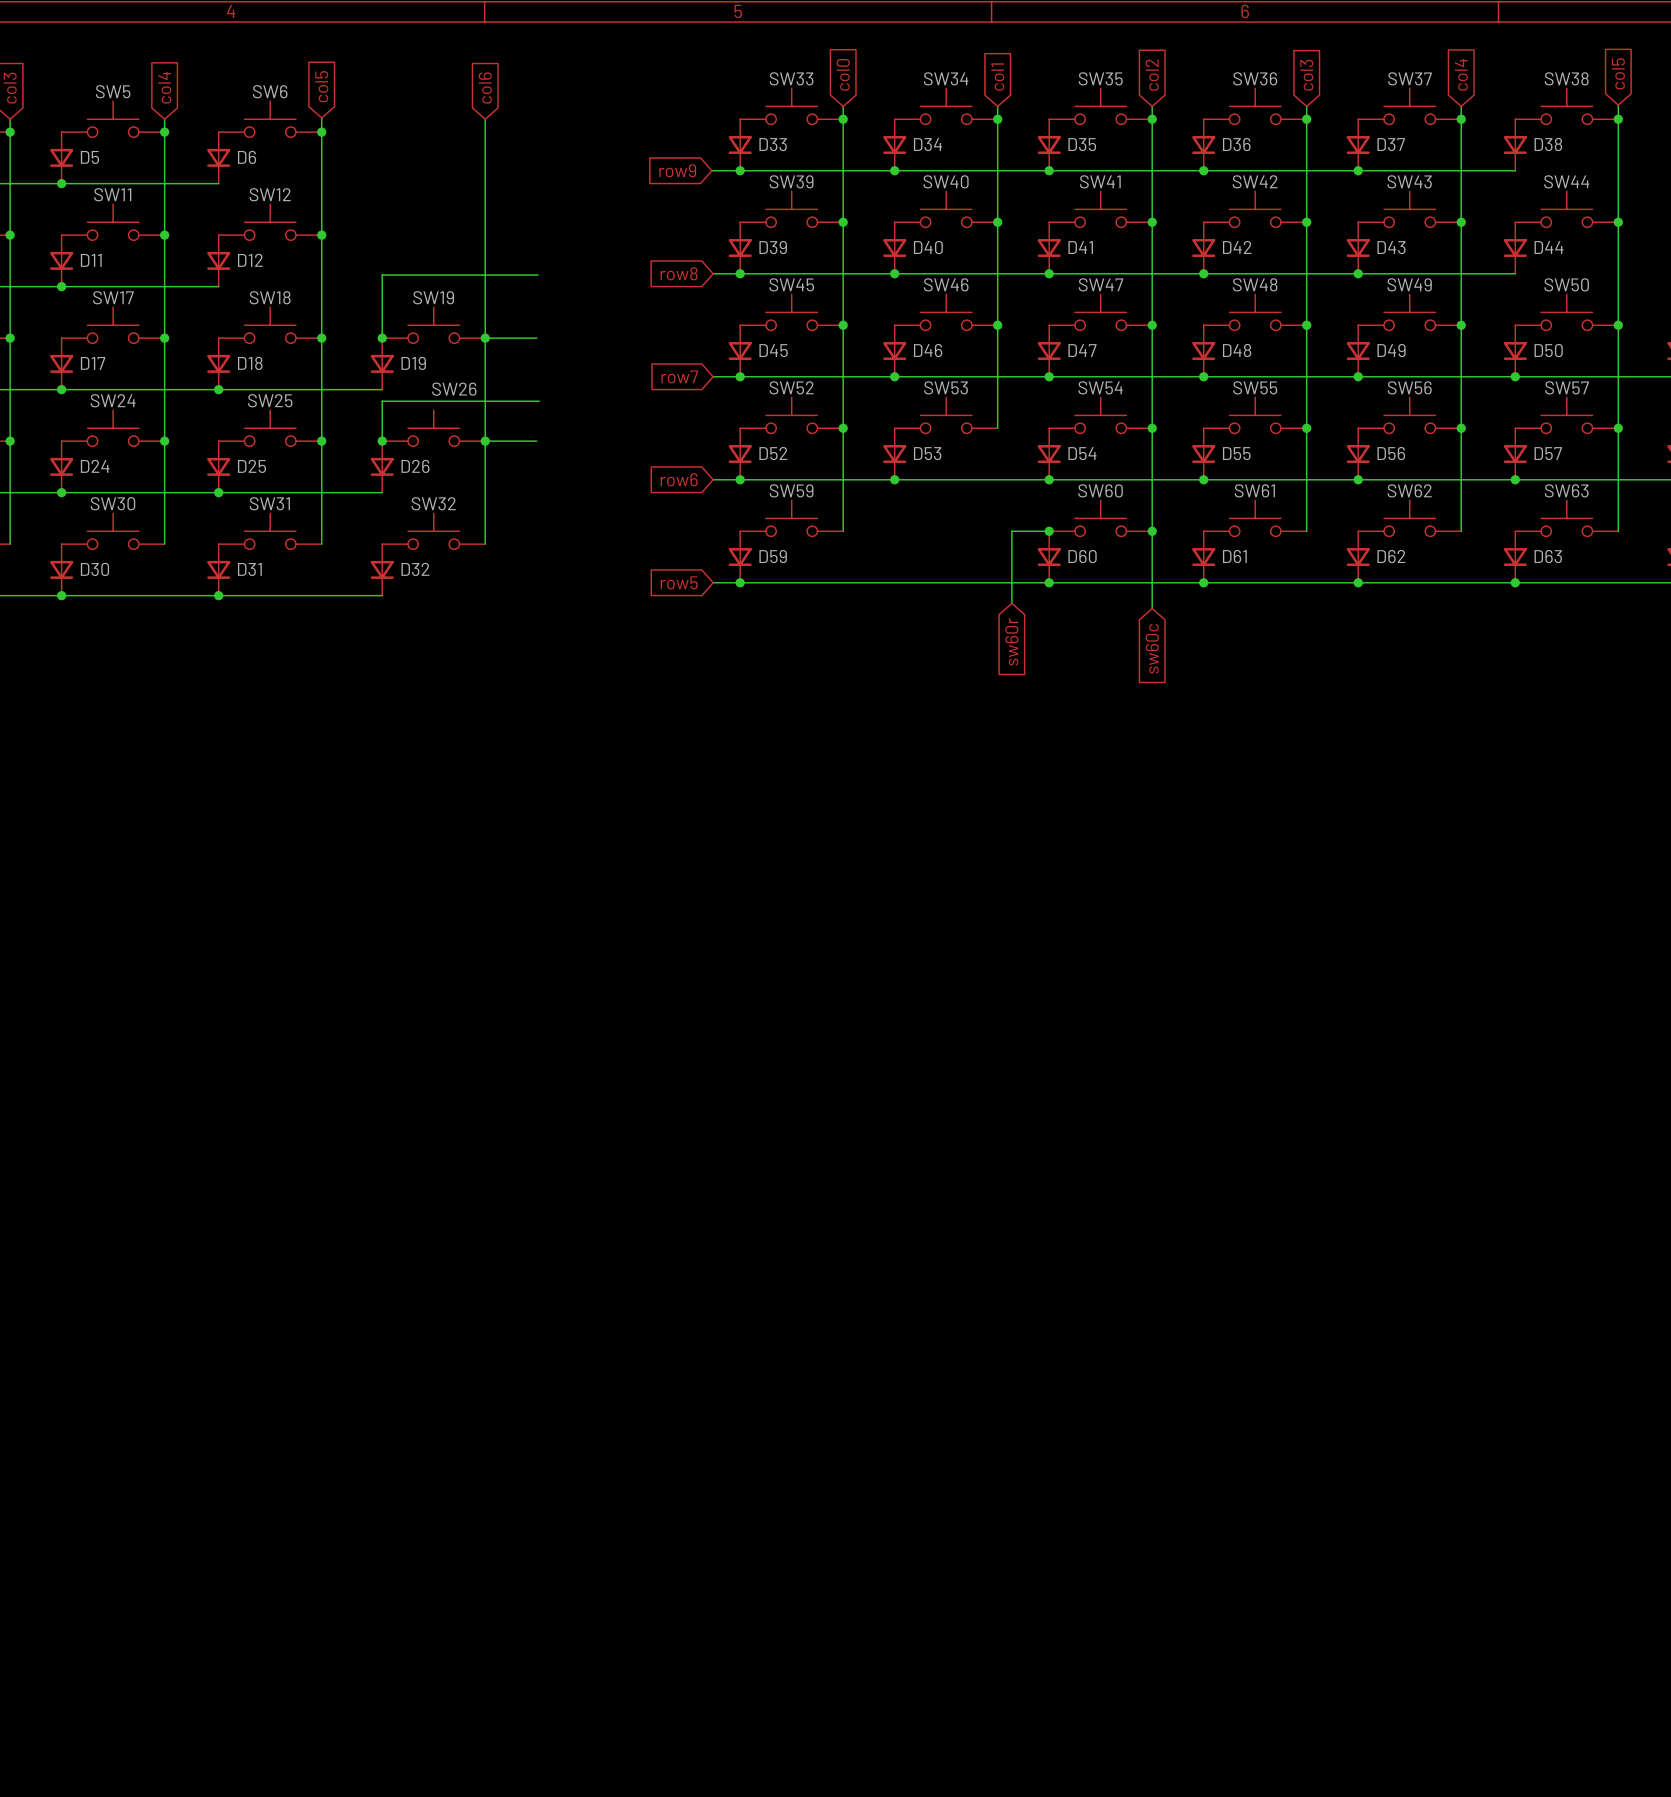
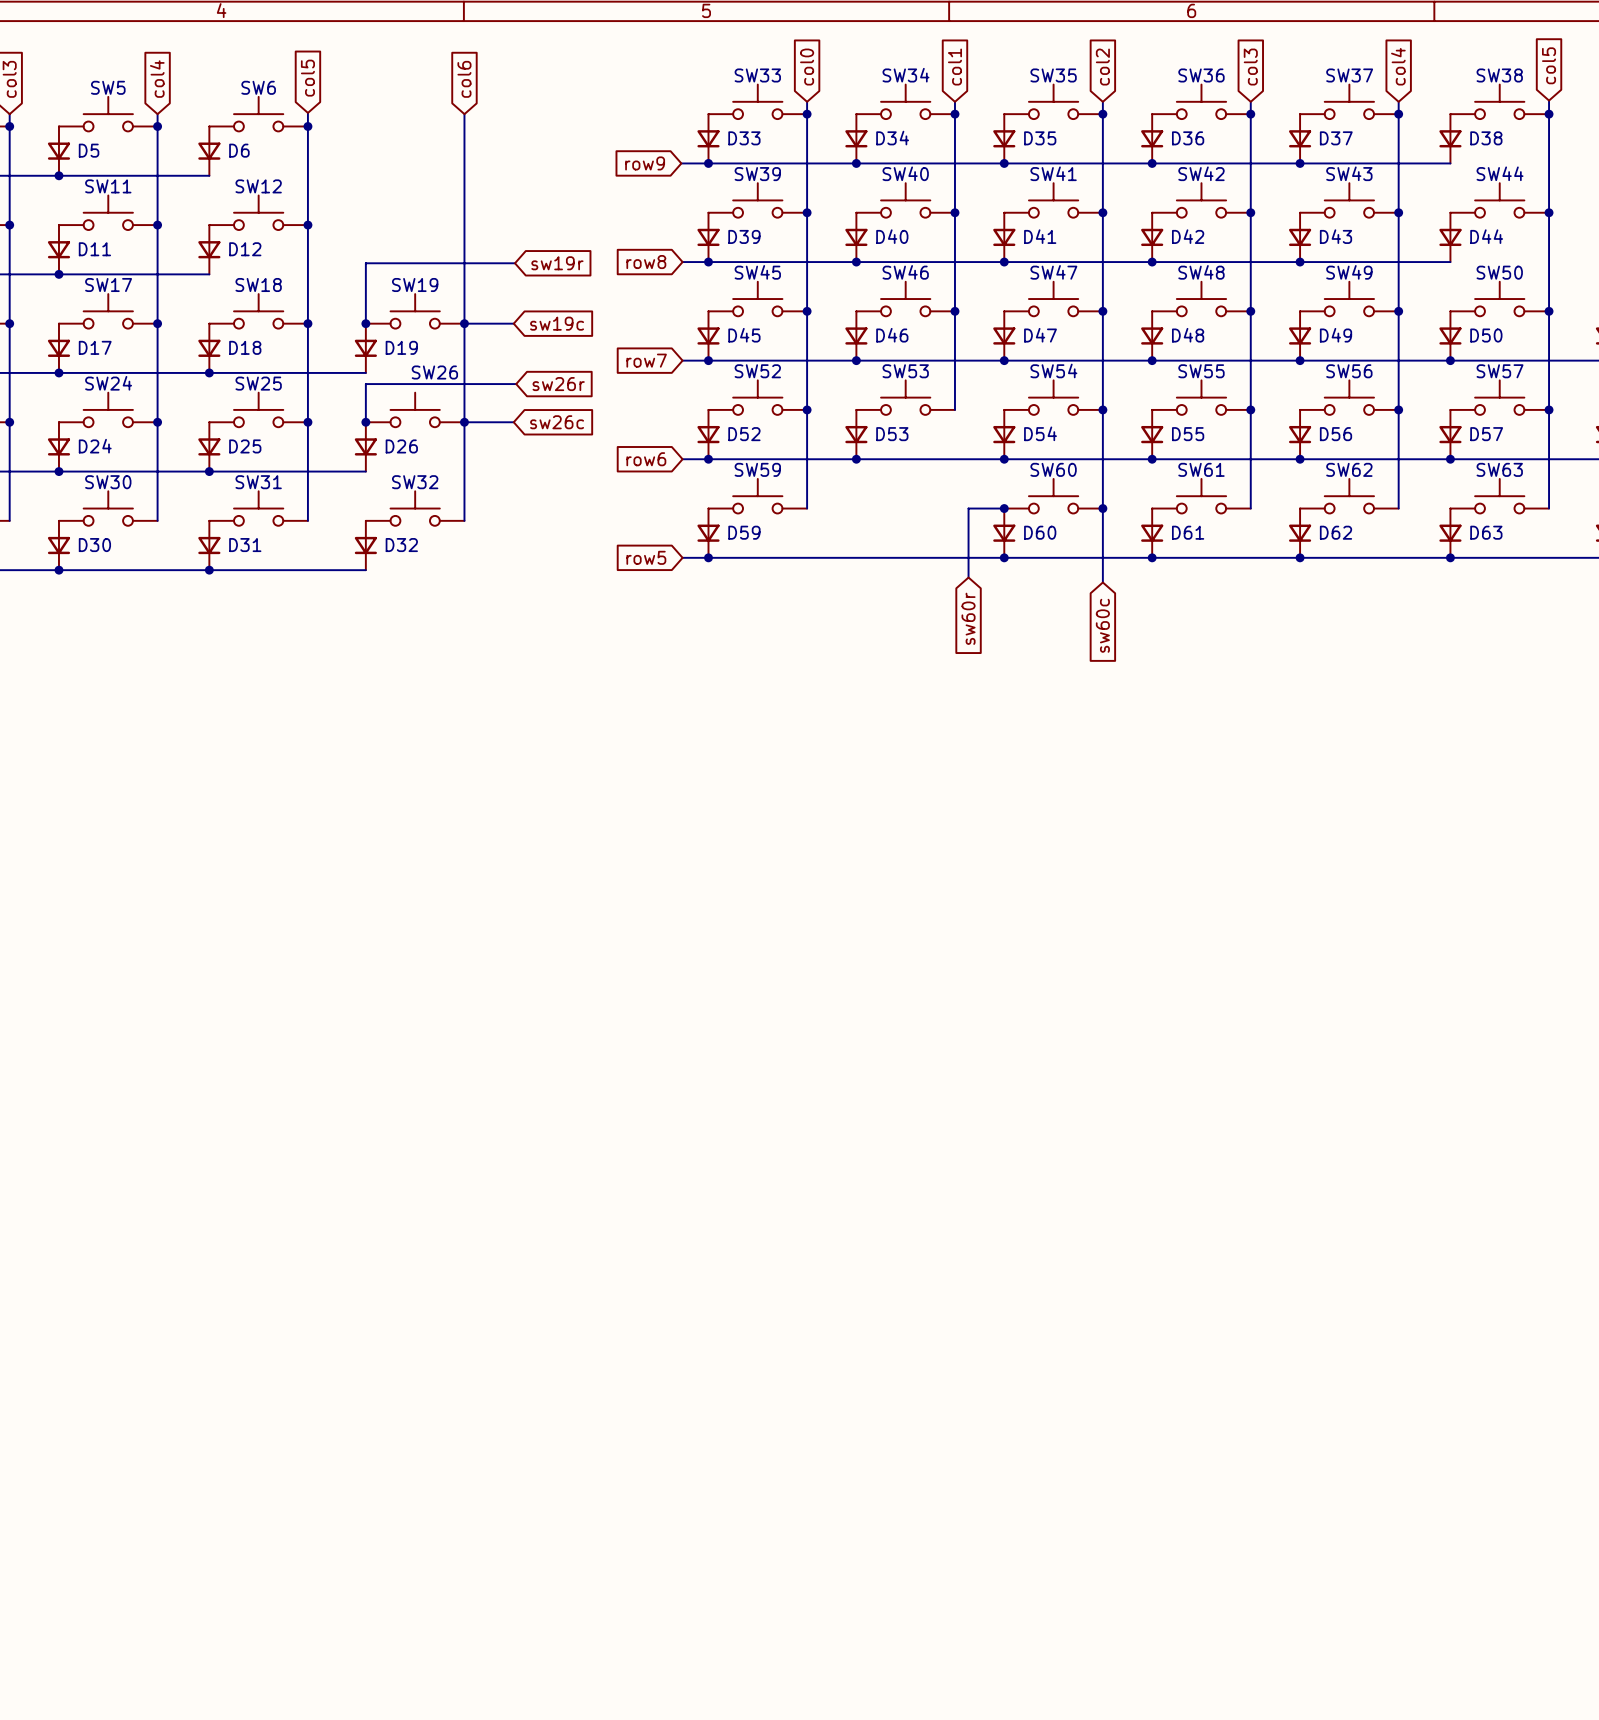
global label: none -> sw19r (557, 263)
global label: none -> sw19c (557, 323)
global label: none -> sw26r (558, 384)
global label: none -> sw26c (557, 422)

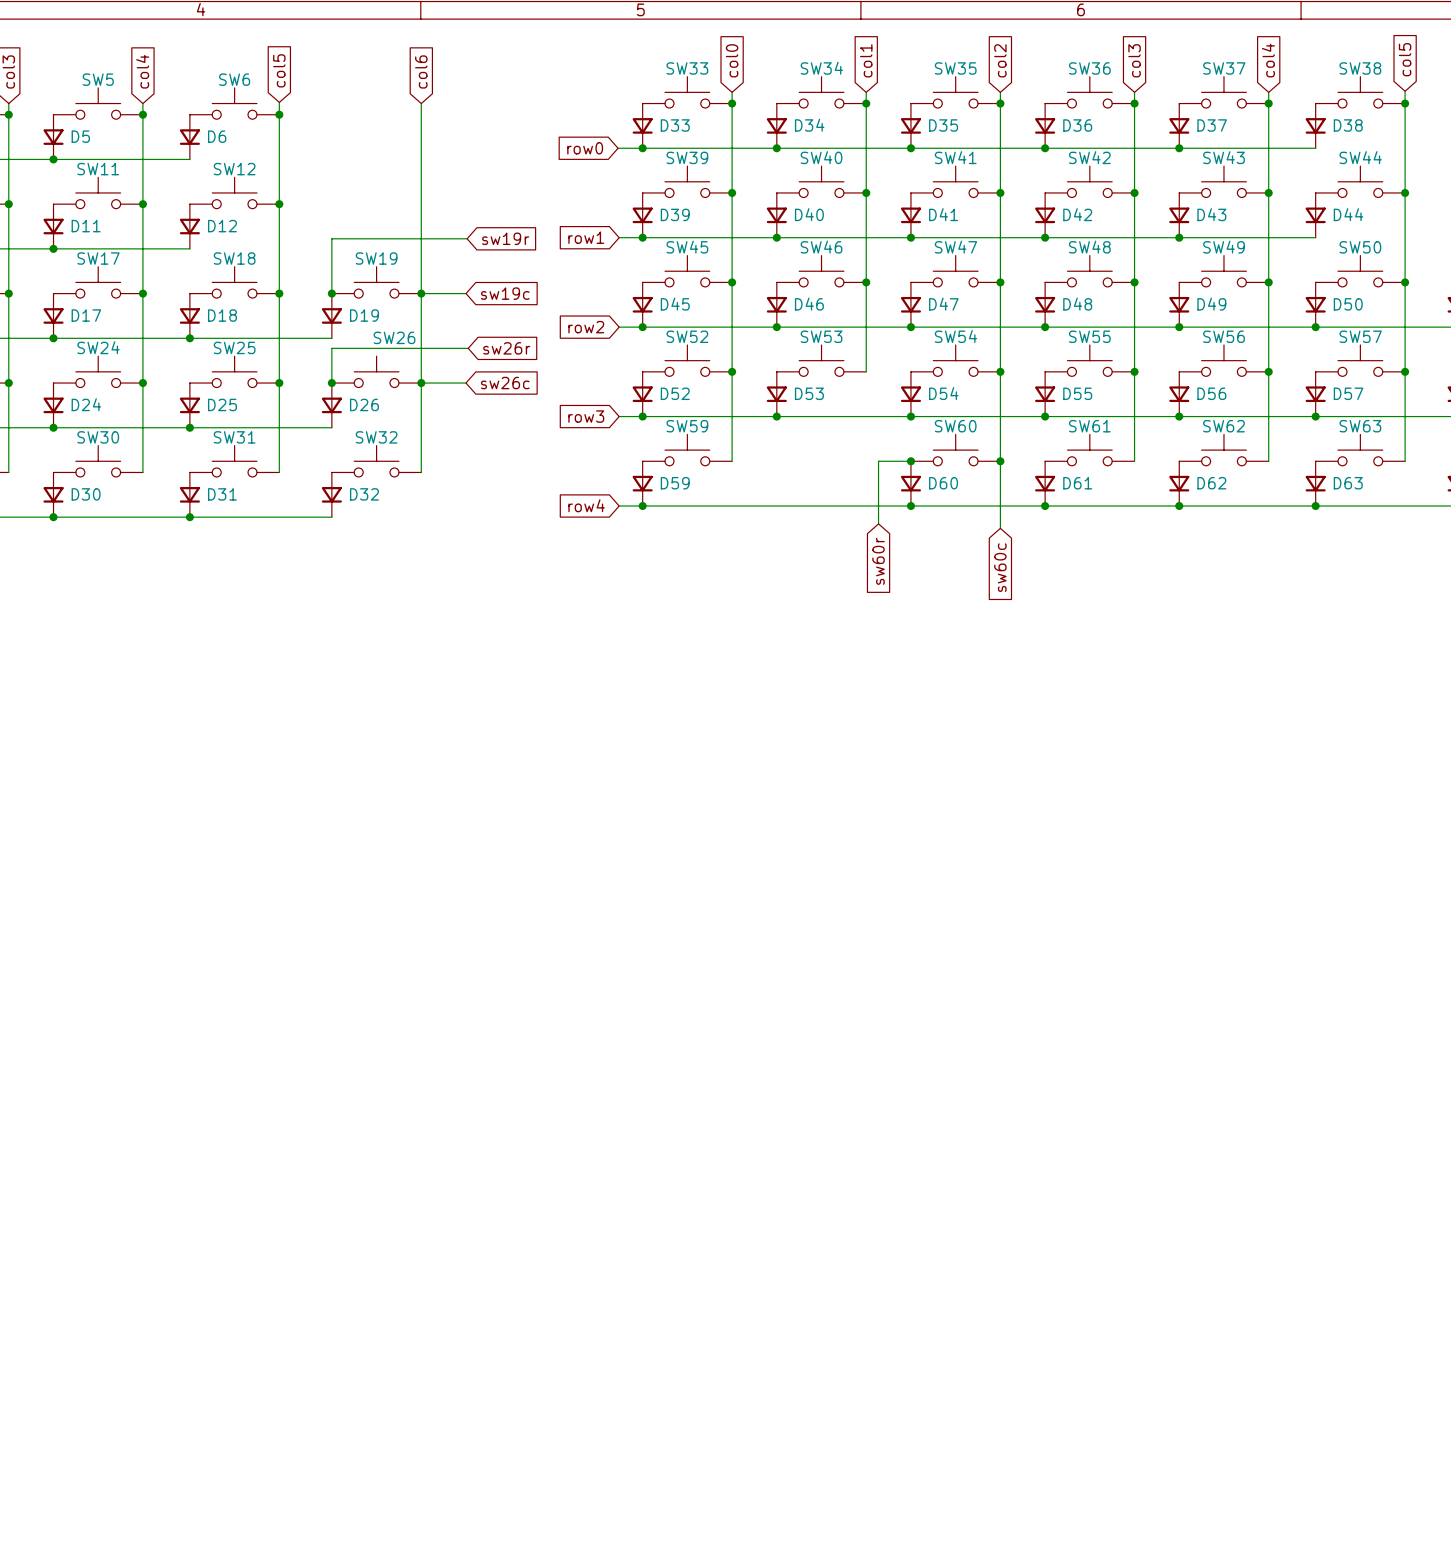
global label: row9 (645, 163) -> row0 (585, 148)
global label: row8 (646, 262) -> row1 (586, 237)
global label: row7 (646, 360) -> row2 (586, 327)
global label: row6 (646, 459) -> row3 (586, 416)
global label: row5 (646, 557) -> row4 (586, 505)

